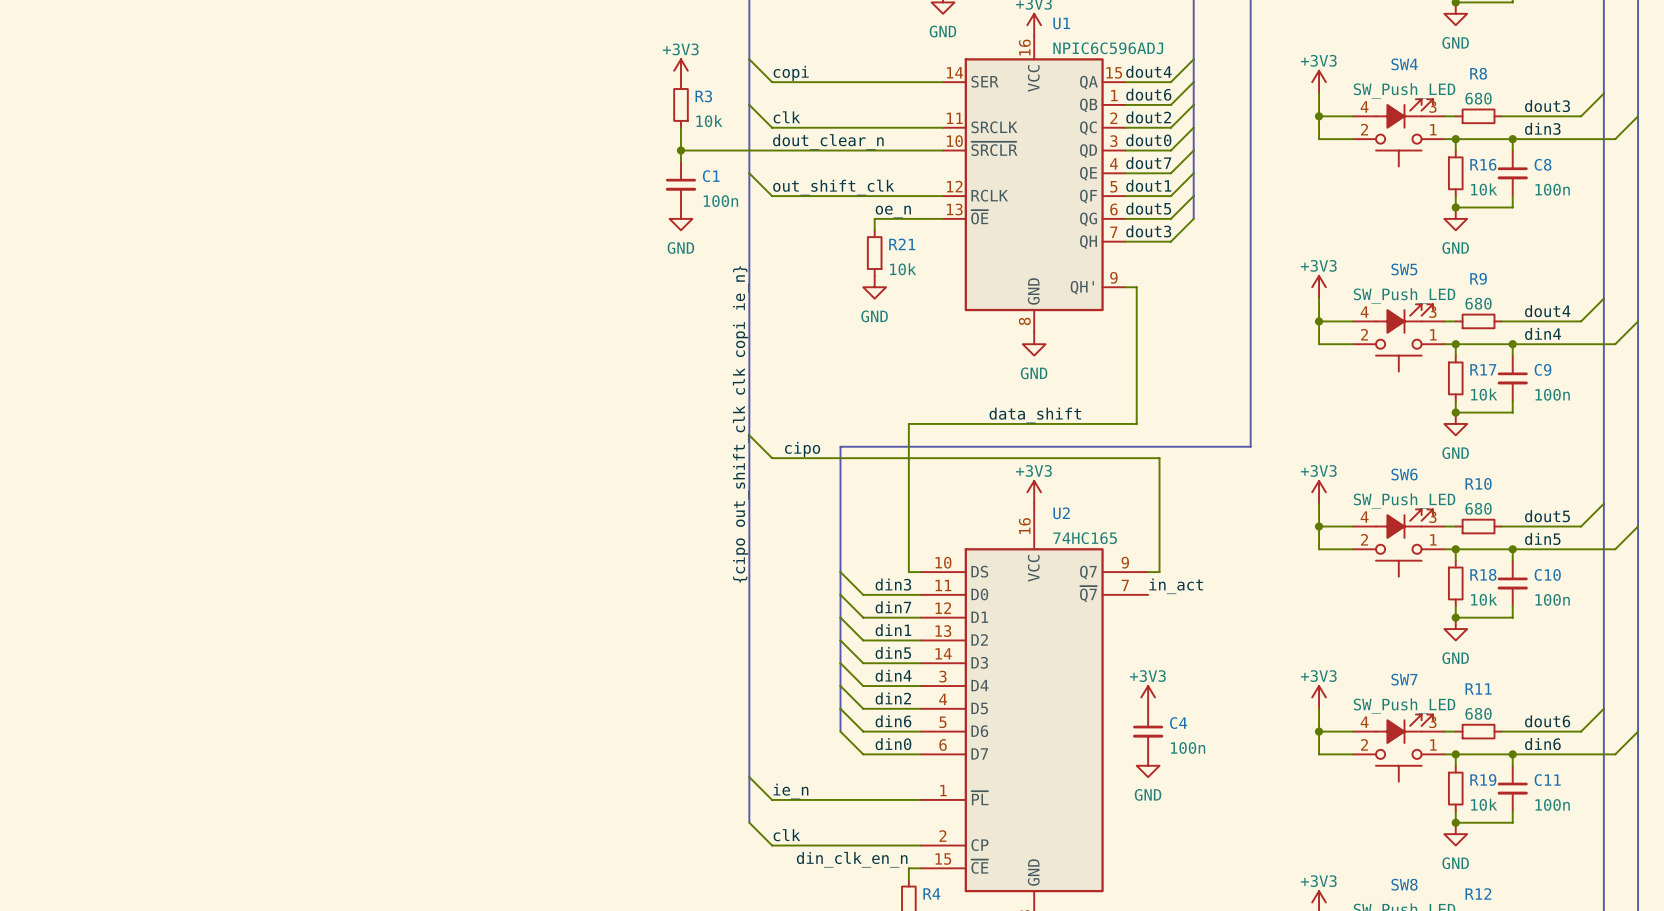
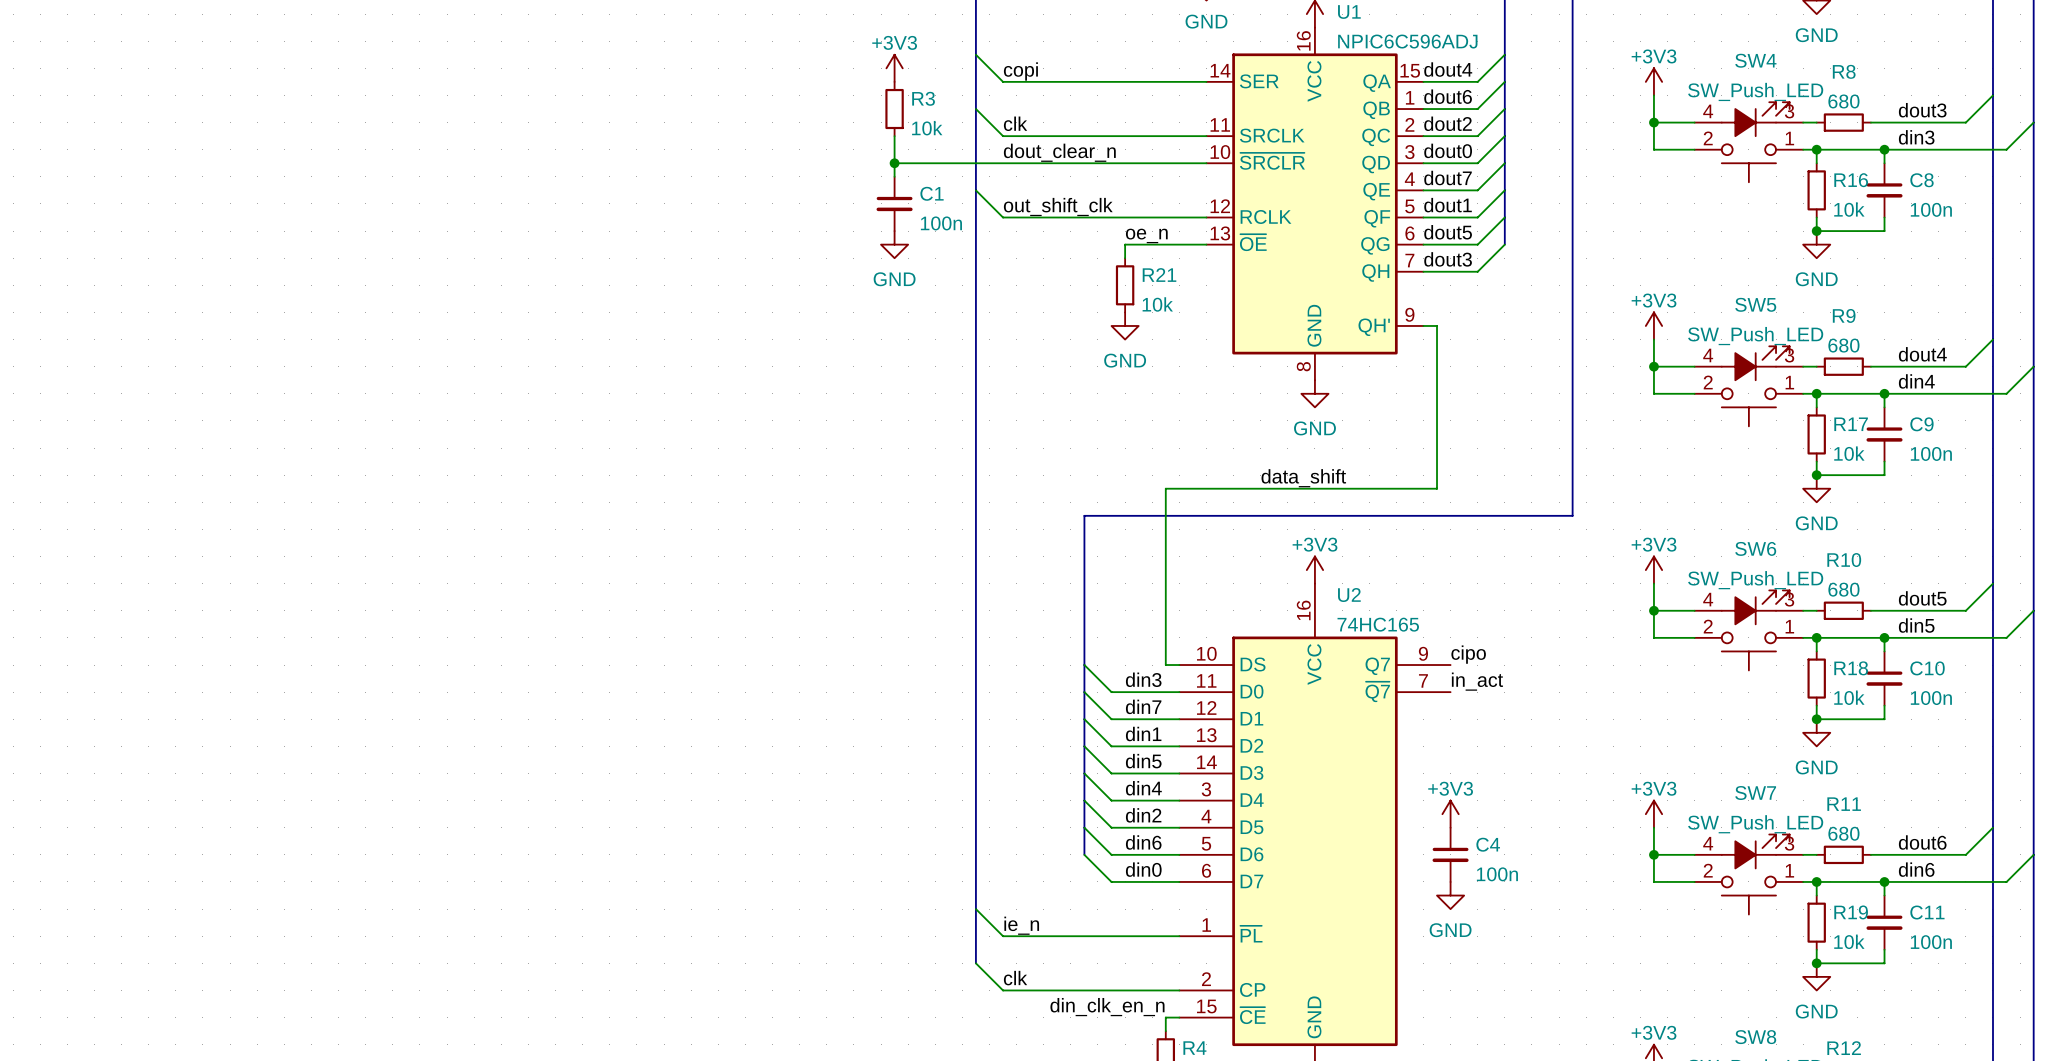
label: {cipo out_shift_clk clk copi ie_n} (740, 424) -> none
wire: (749, 435) (772, 458) (1159, 458) (1159, 572) (1148, 572) -> none
label: cipo (802, 449) -> none
label: none -> cipo (1468, 654)

